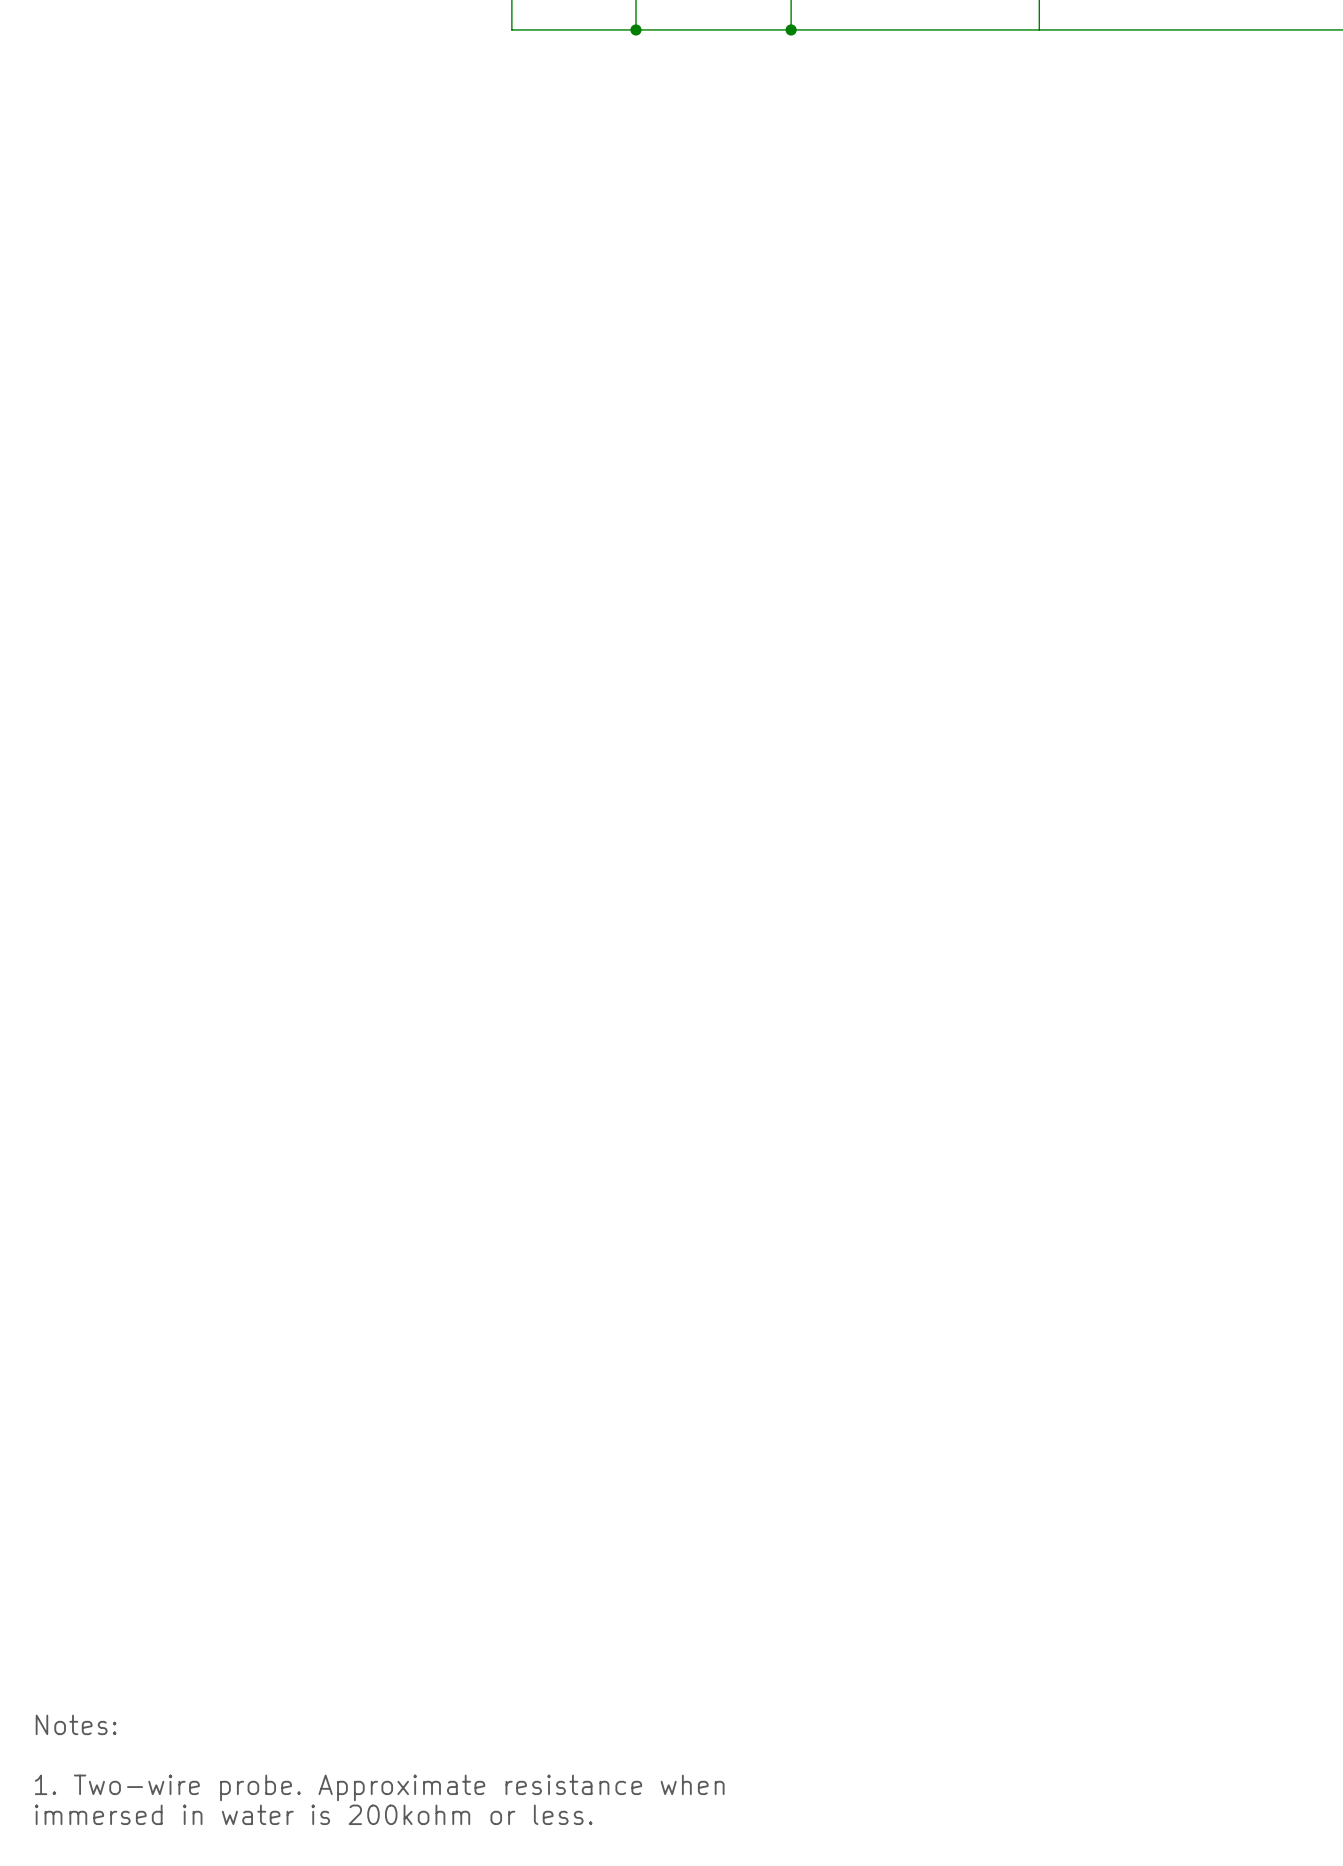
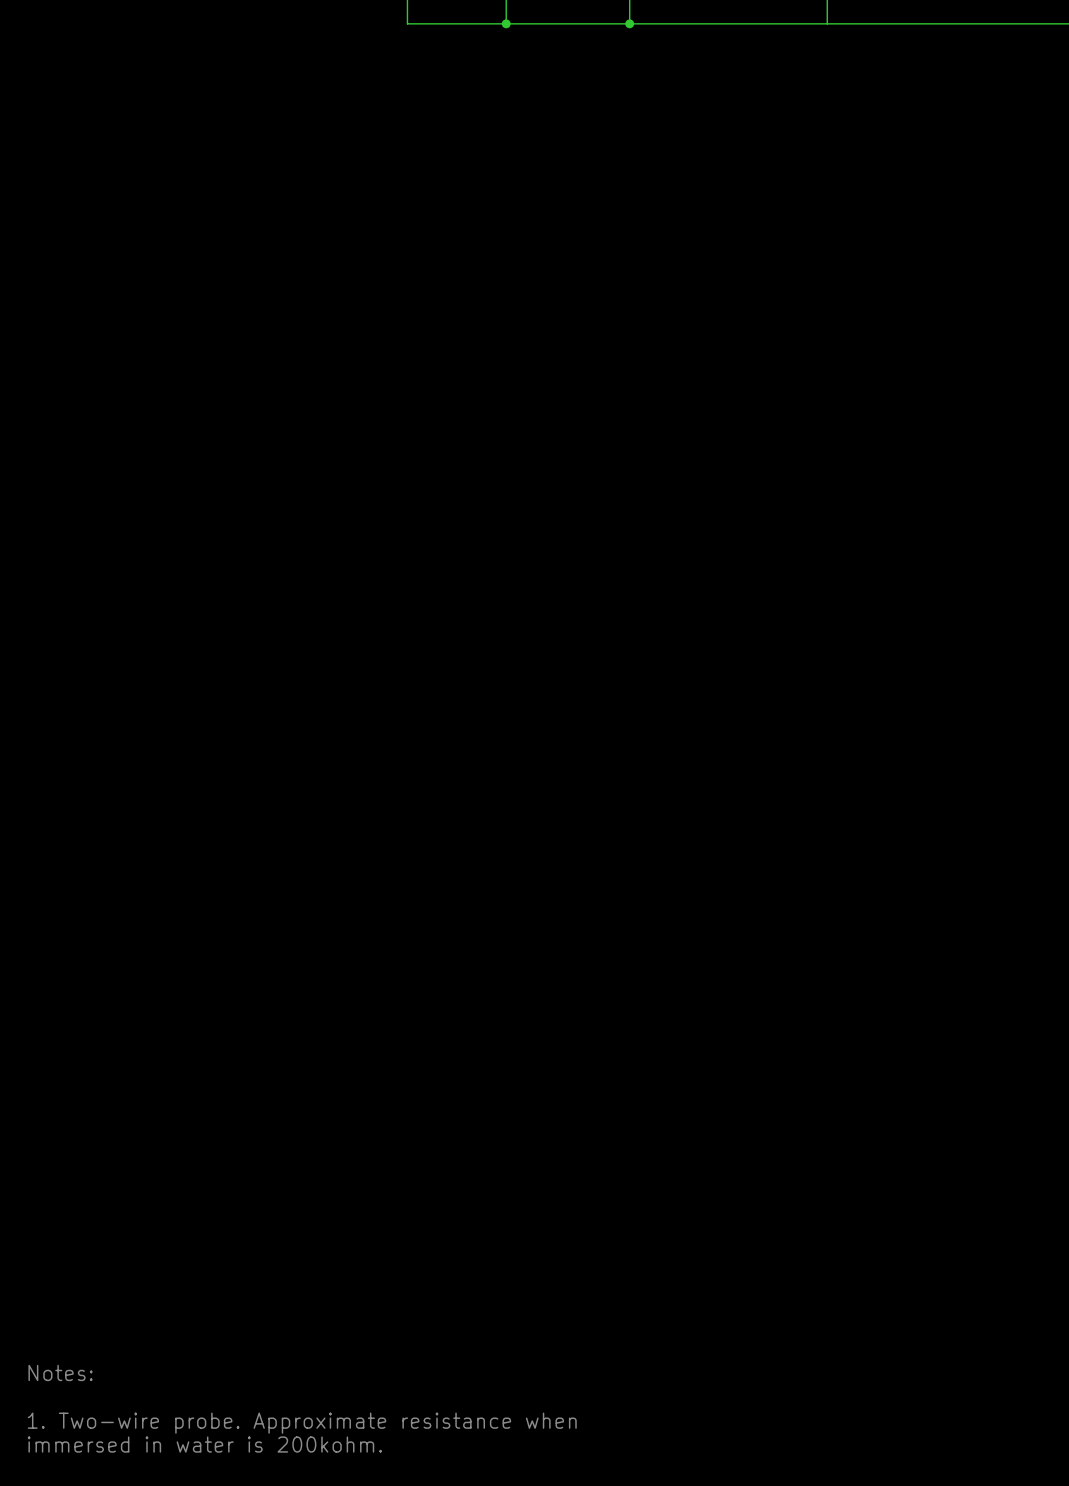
text: immersed in water is 200kohm or less. (313, 1814) -> immersed in water is 200kohm. (204, 1444)

